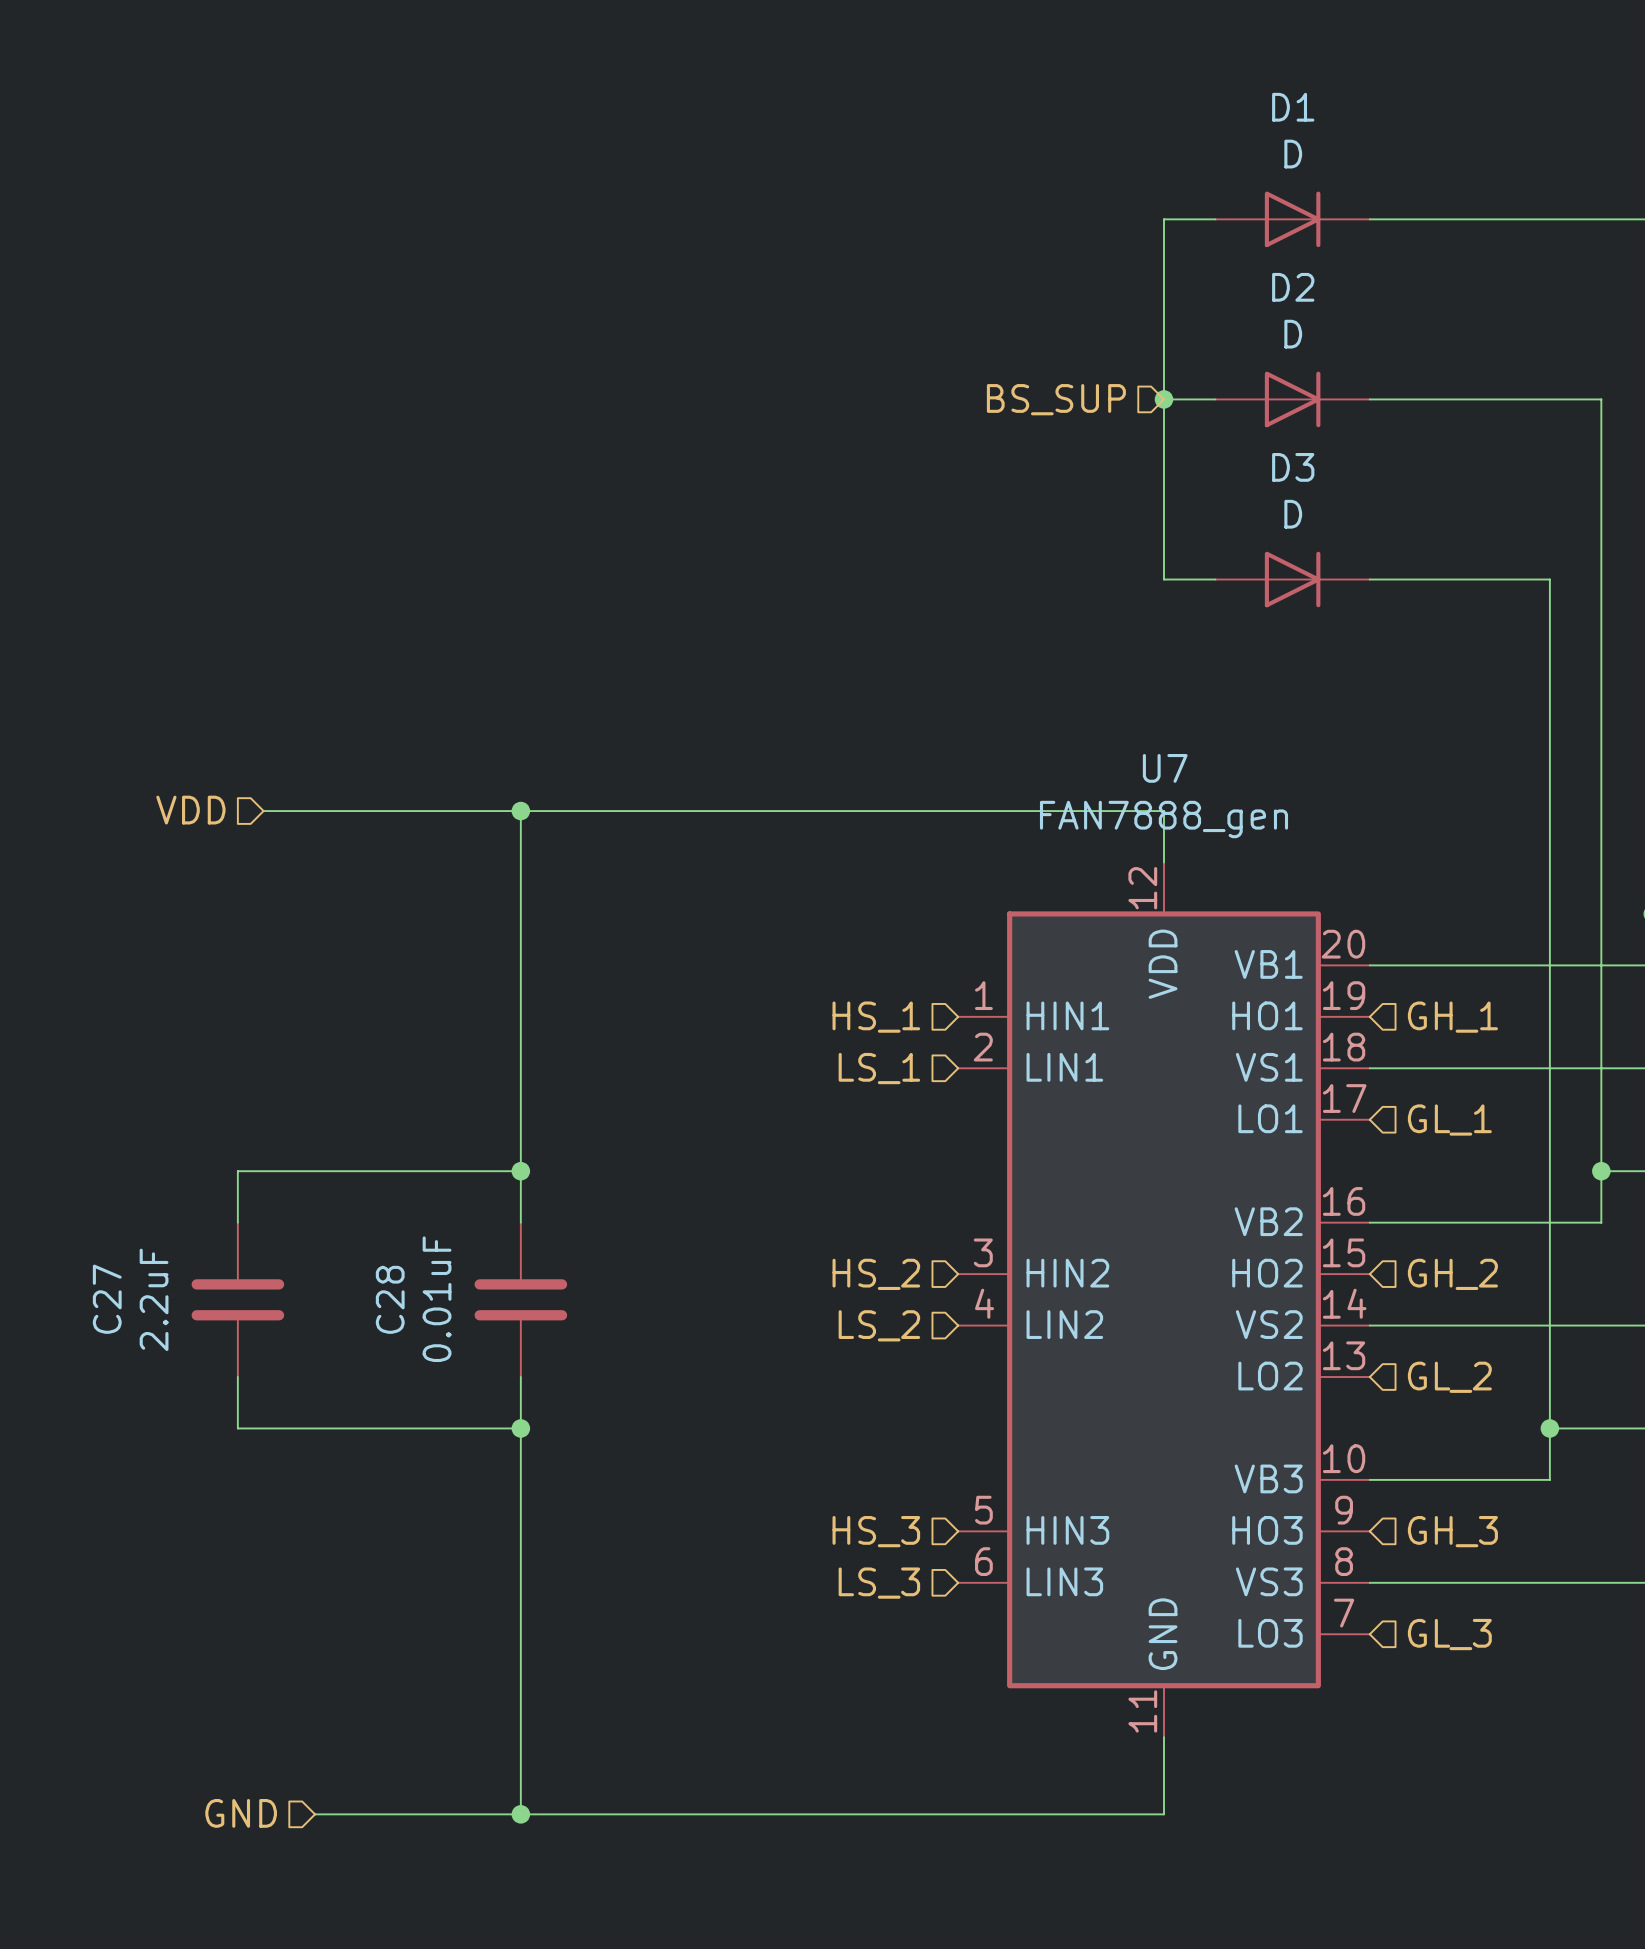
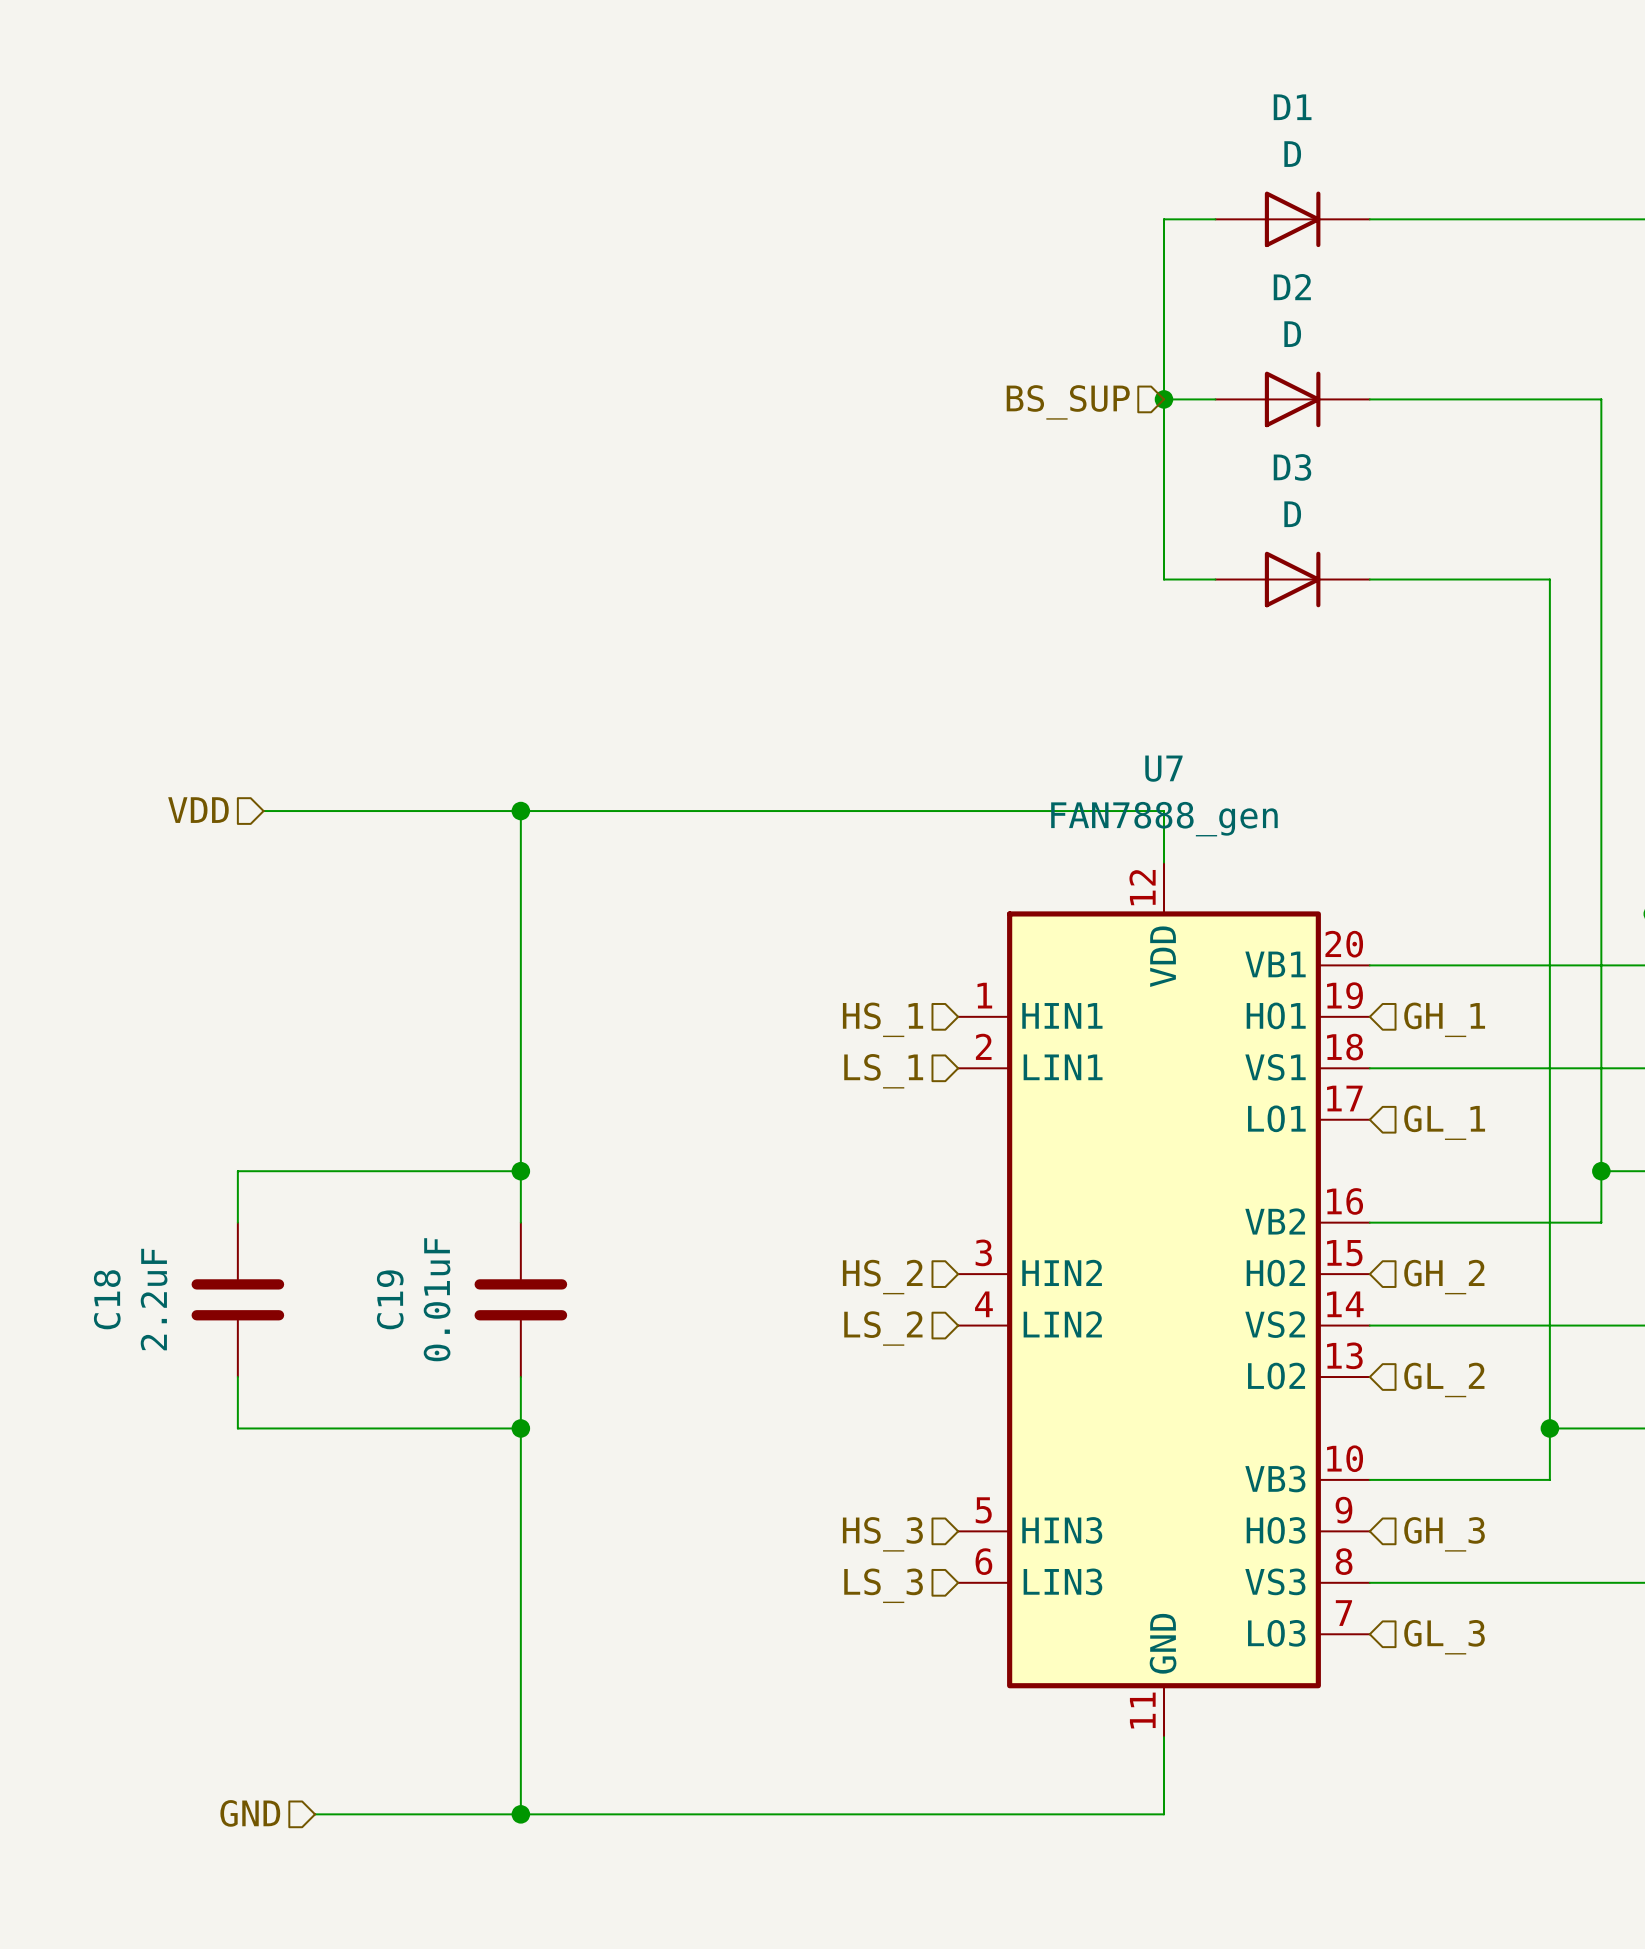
C27 name: C27 (107, 1299) -> C18 (107, 1299)
C28 name: C28 (390, 1299) -> C19 (390, 1299)

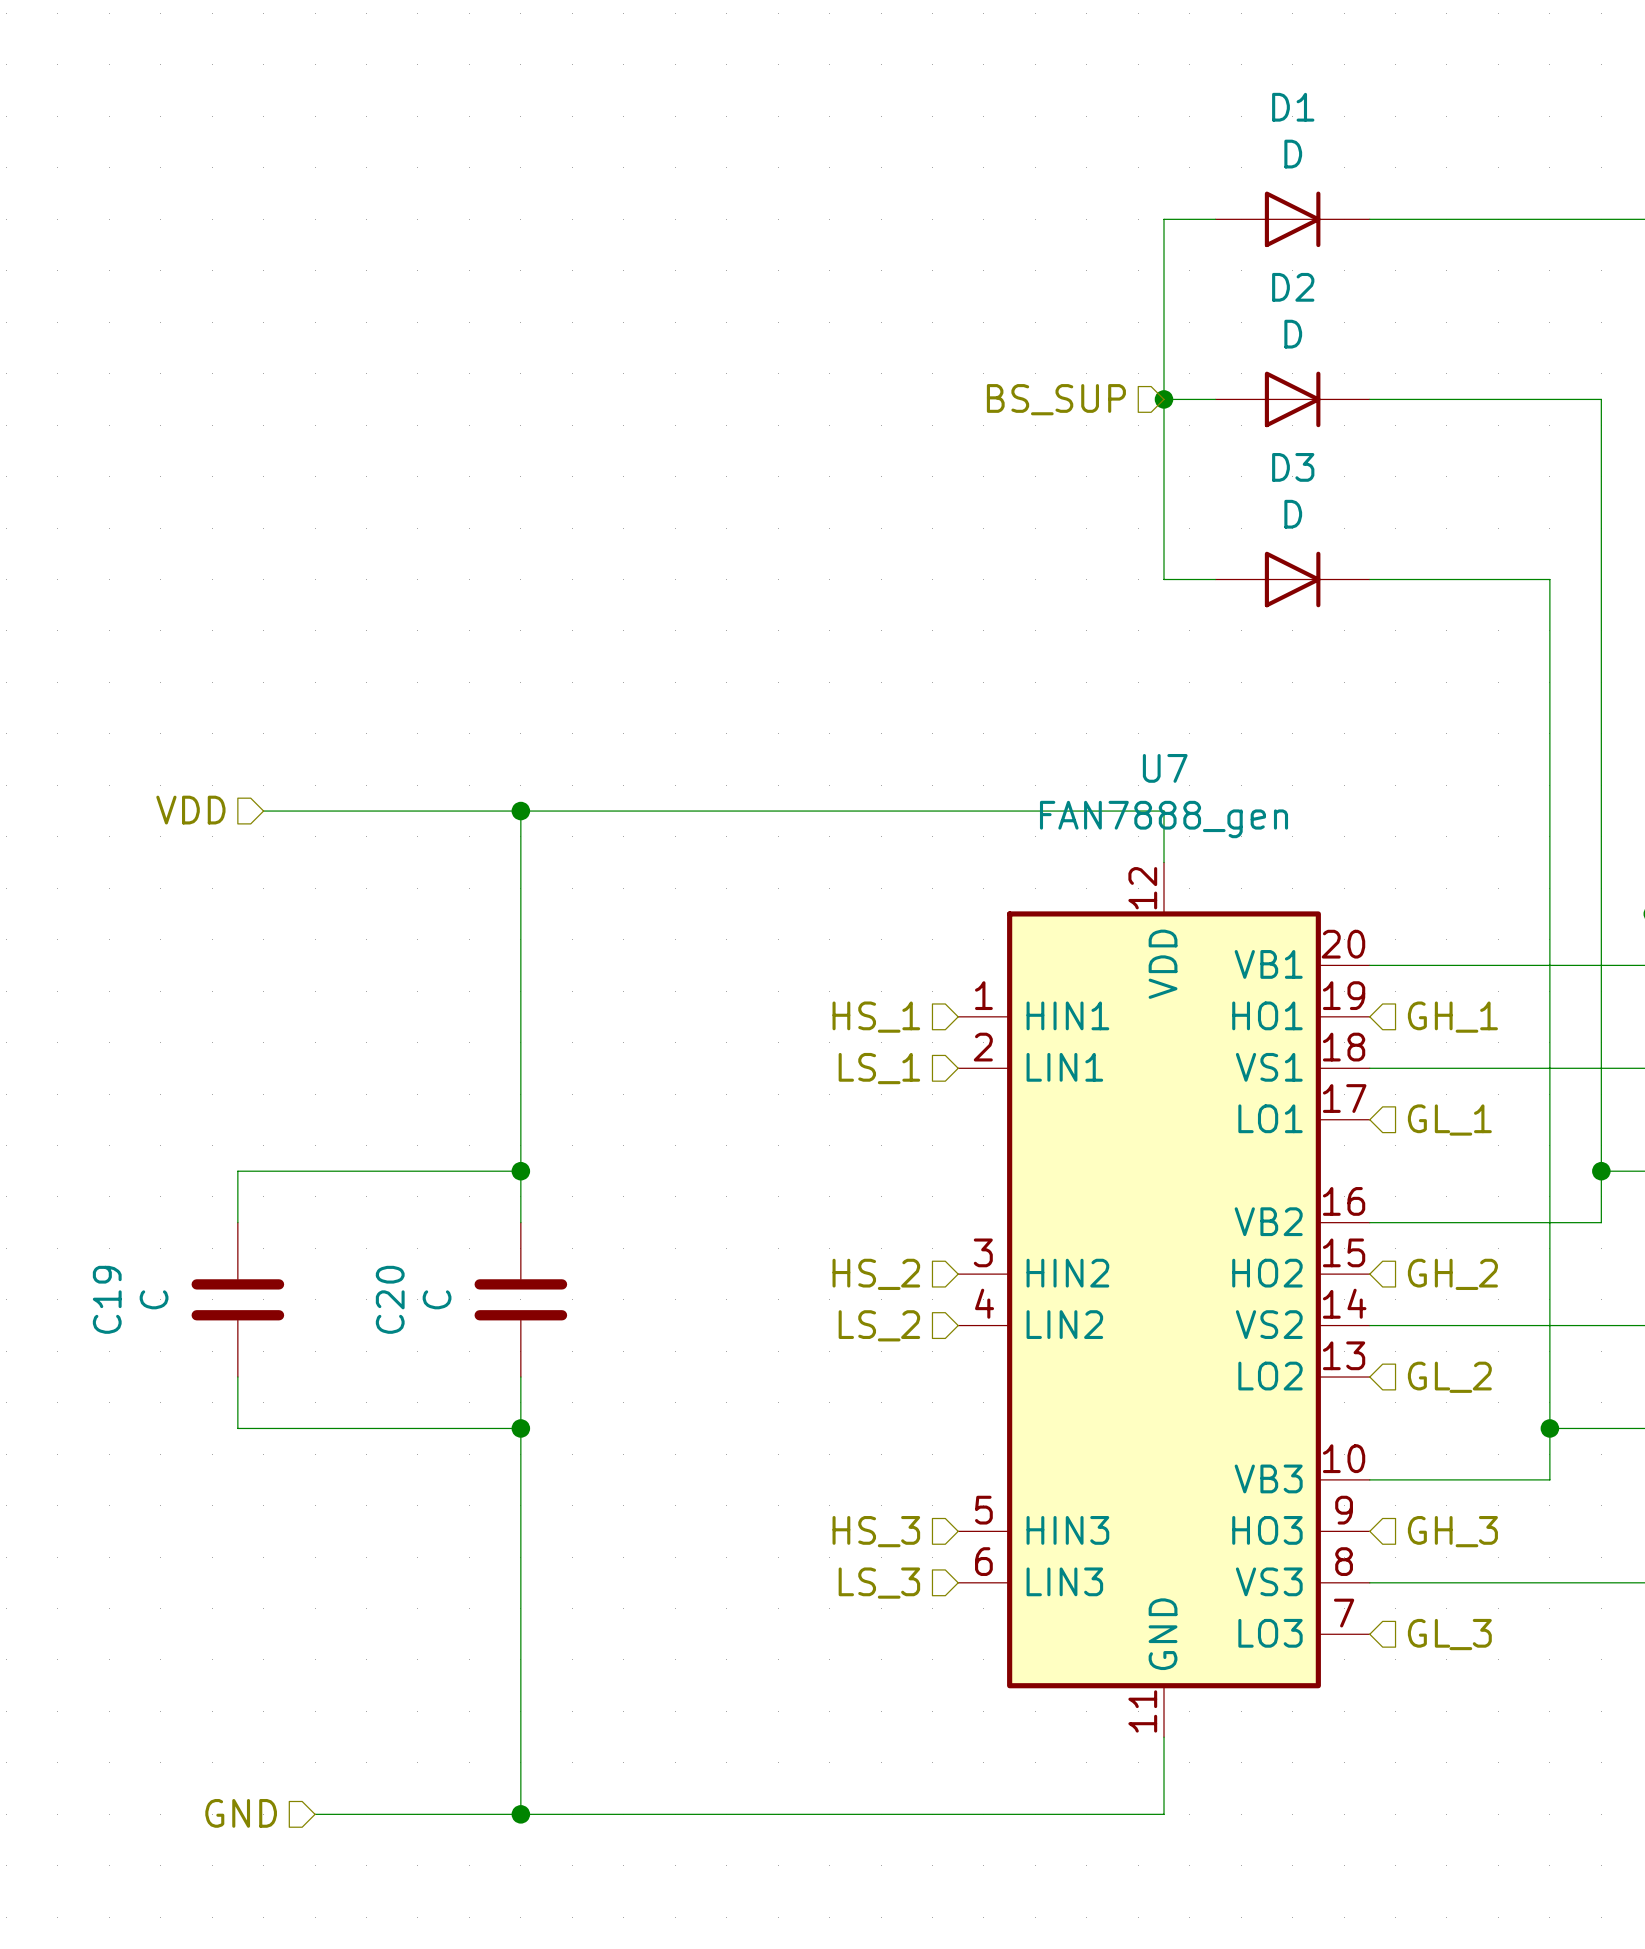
C18 name: C18 (107, 1299) -> C19 (107, 1299)
C18 value: 2.2uF (154, 1299) -> C (154, 1299)
C19 name: C19 (390, 1299) -> C20 (390, 1299)
C19 value: 0.01uF (437, 1299) -> C (437, 1299)

